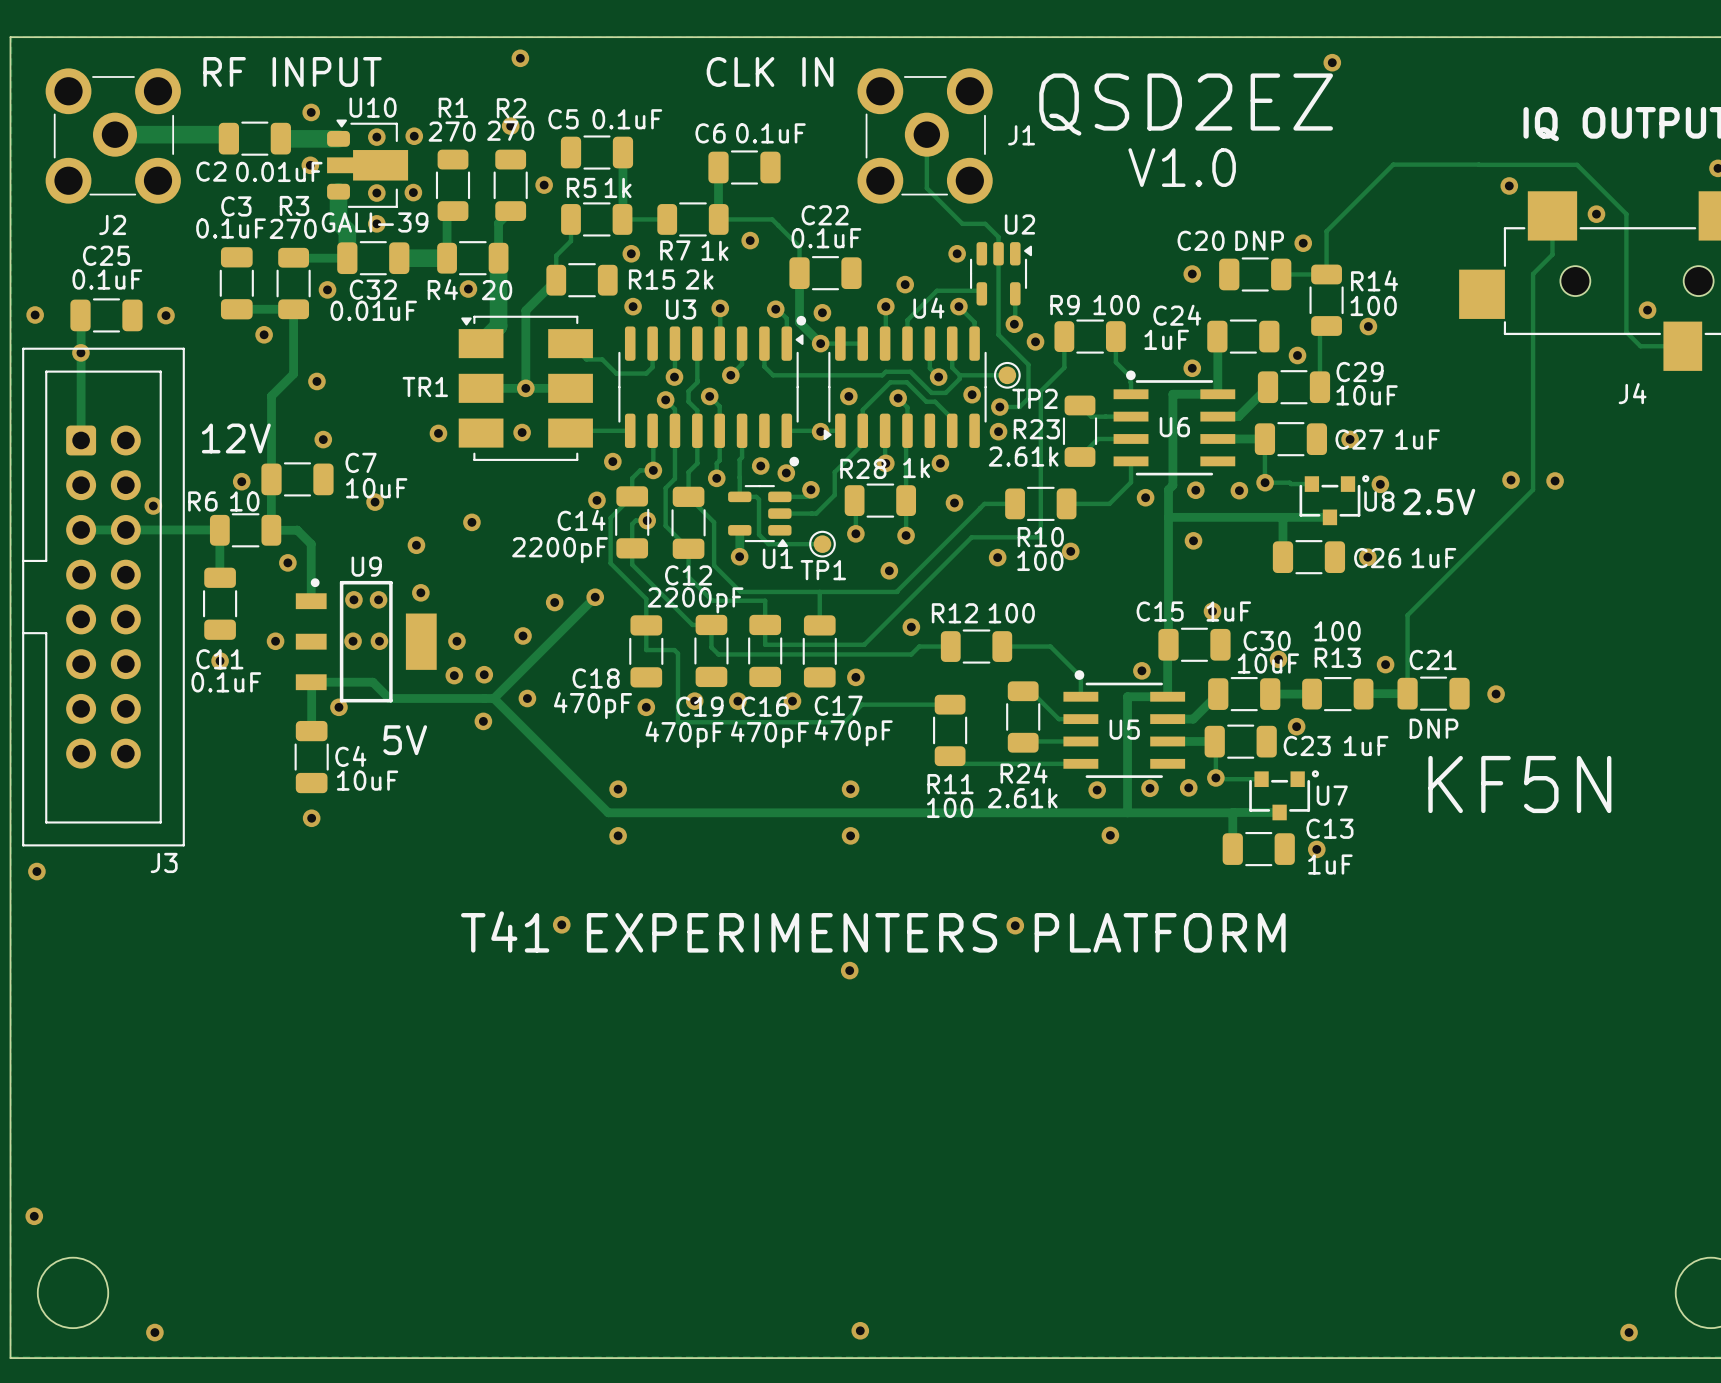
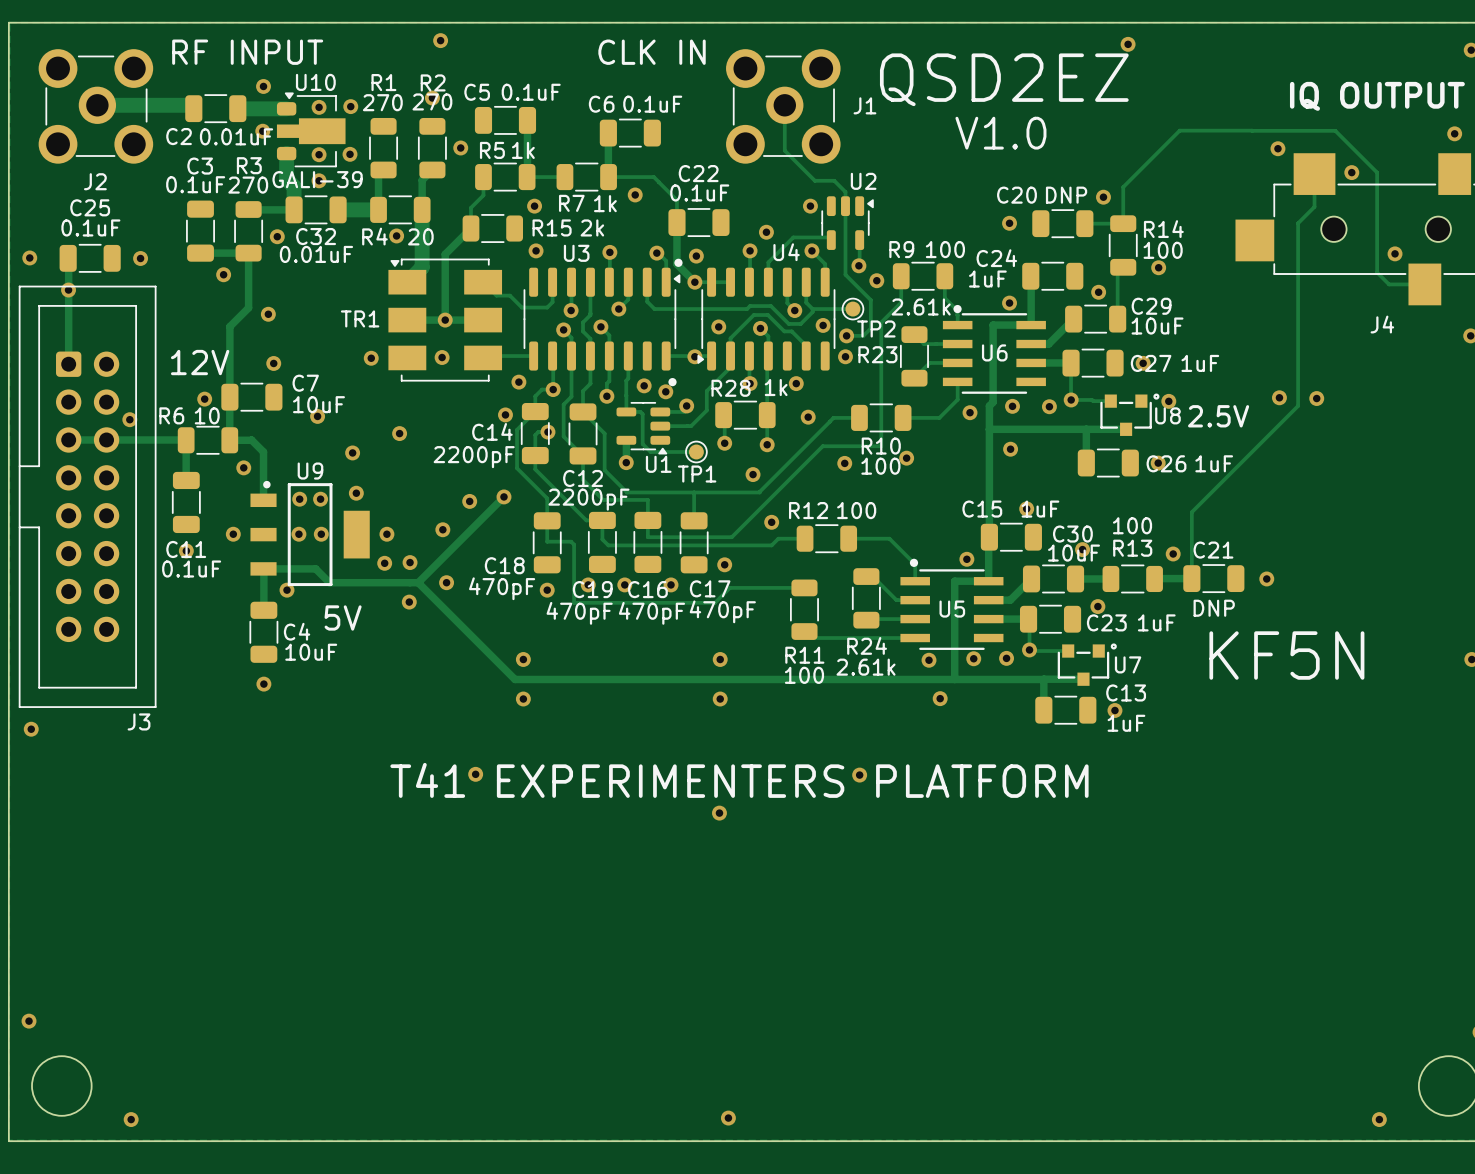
R23 value position: 2.61k (1023, 456) -> 2.61k (921, 307)

